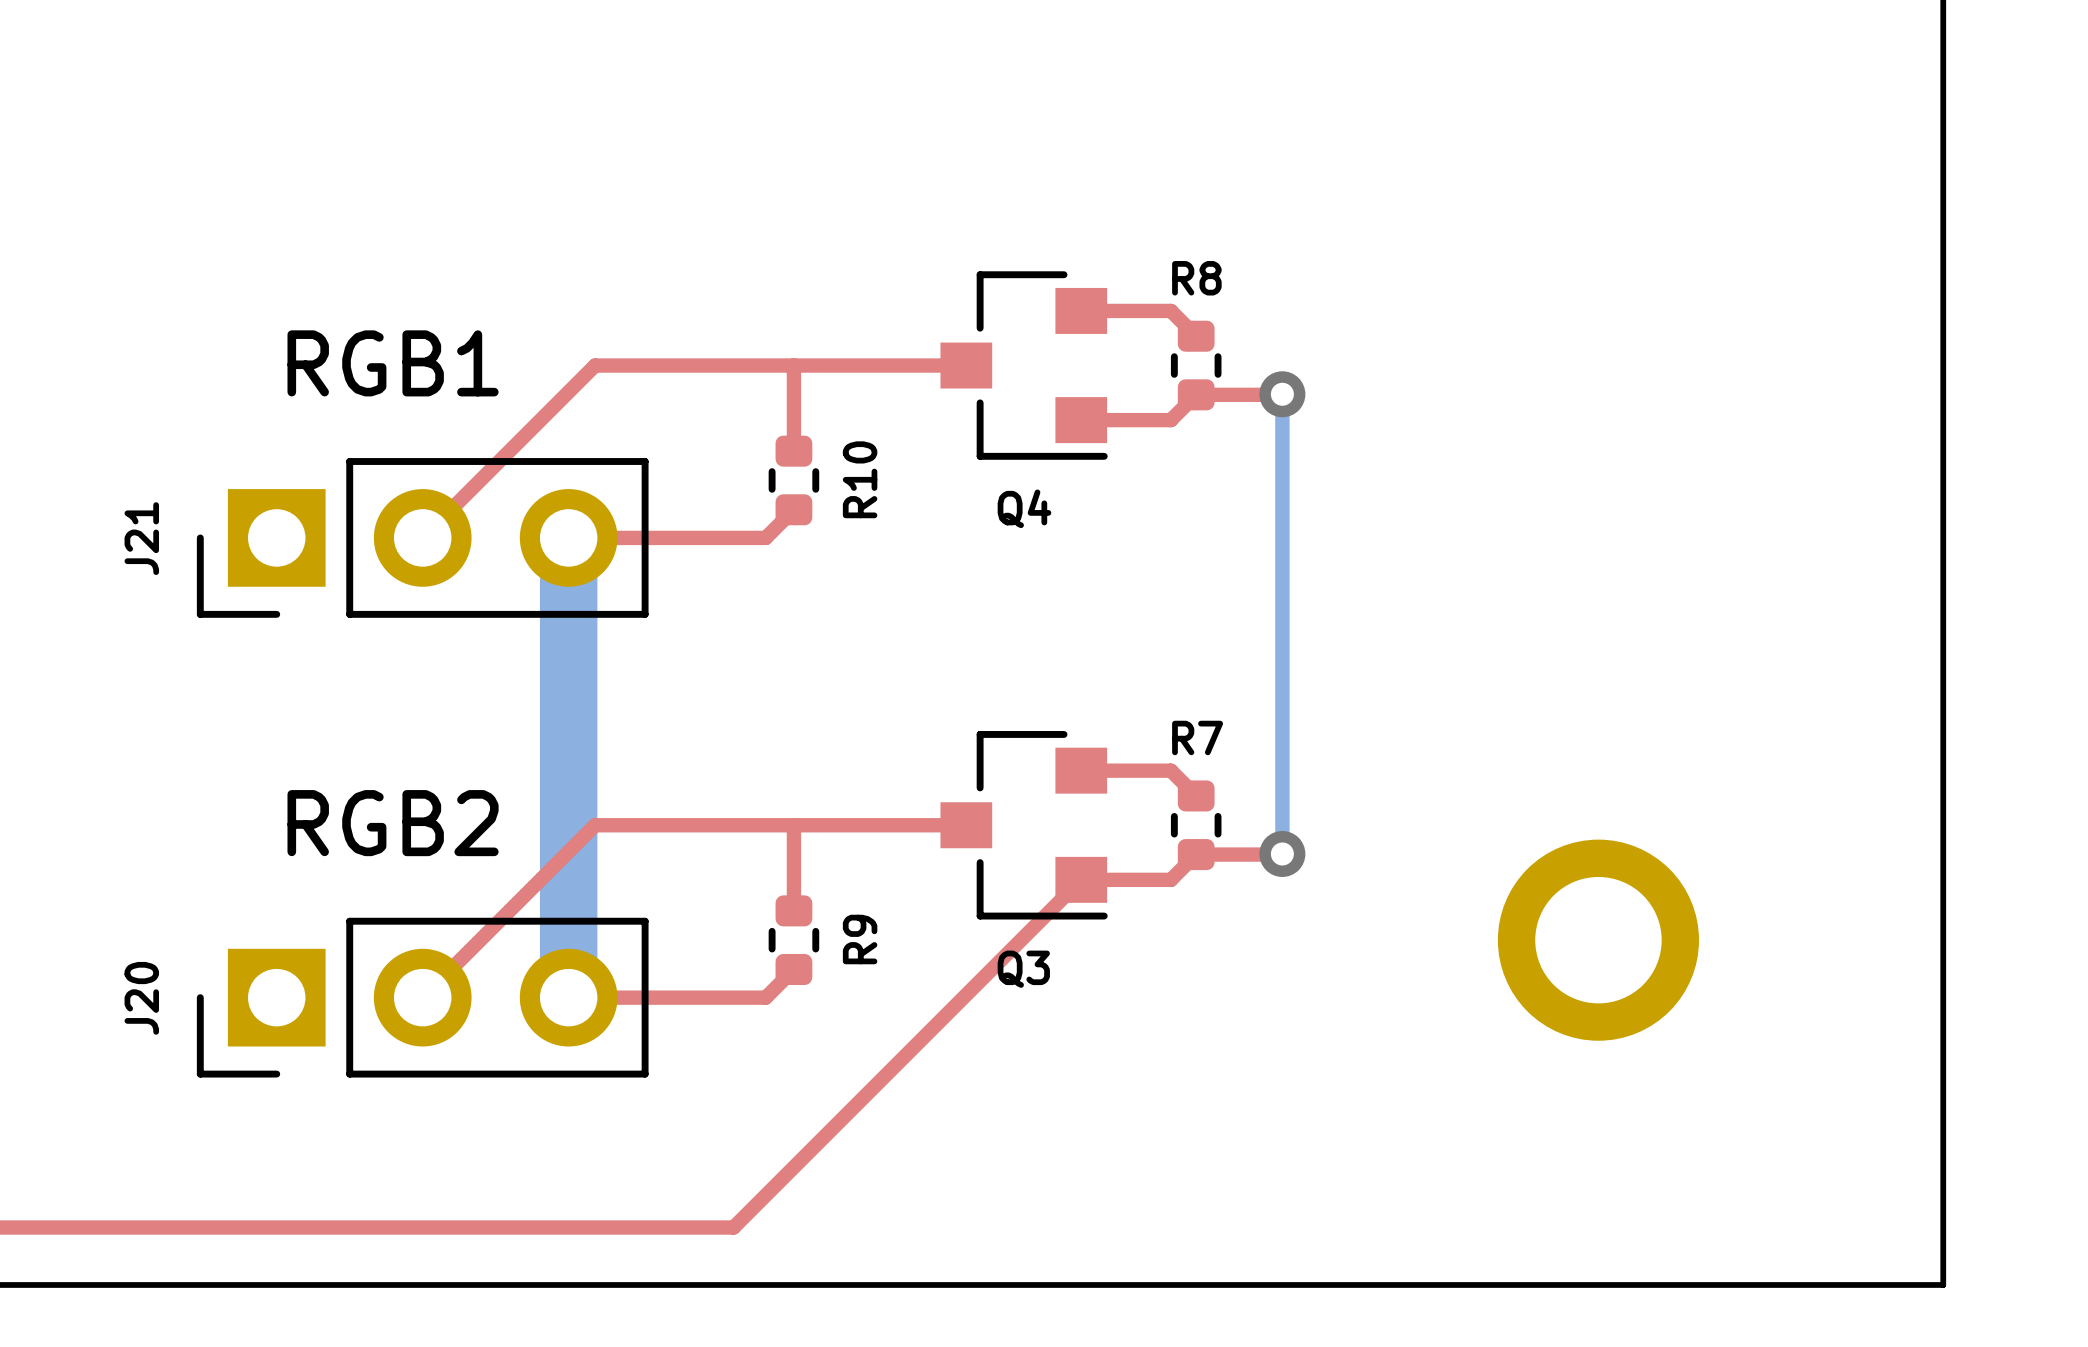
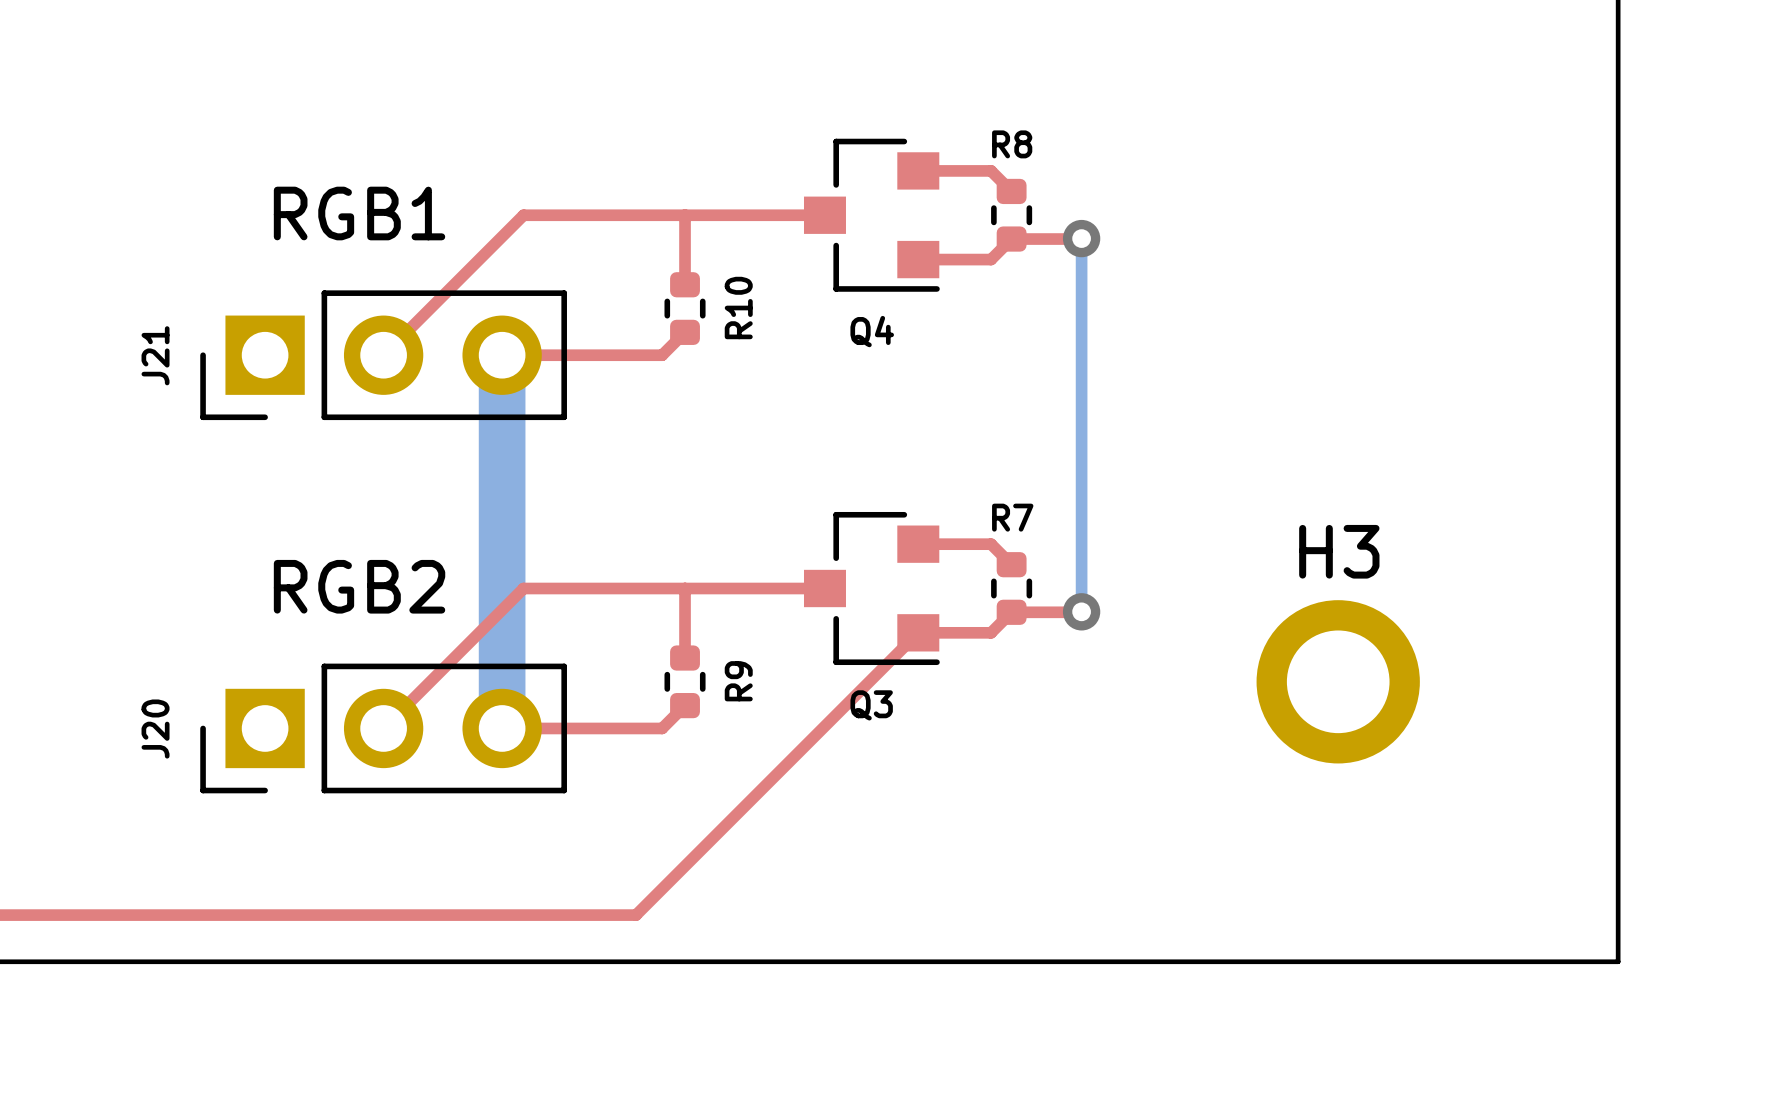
H3 name: none -> H3 (1339, 551)

